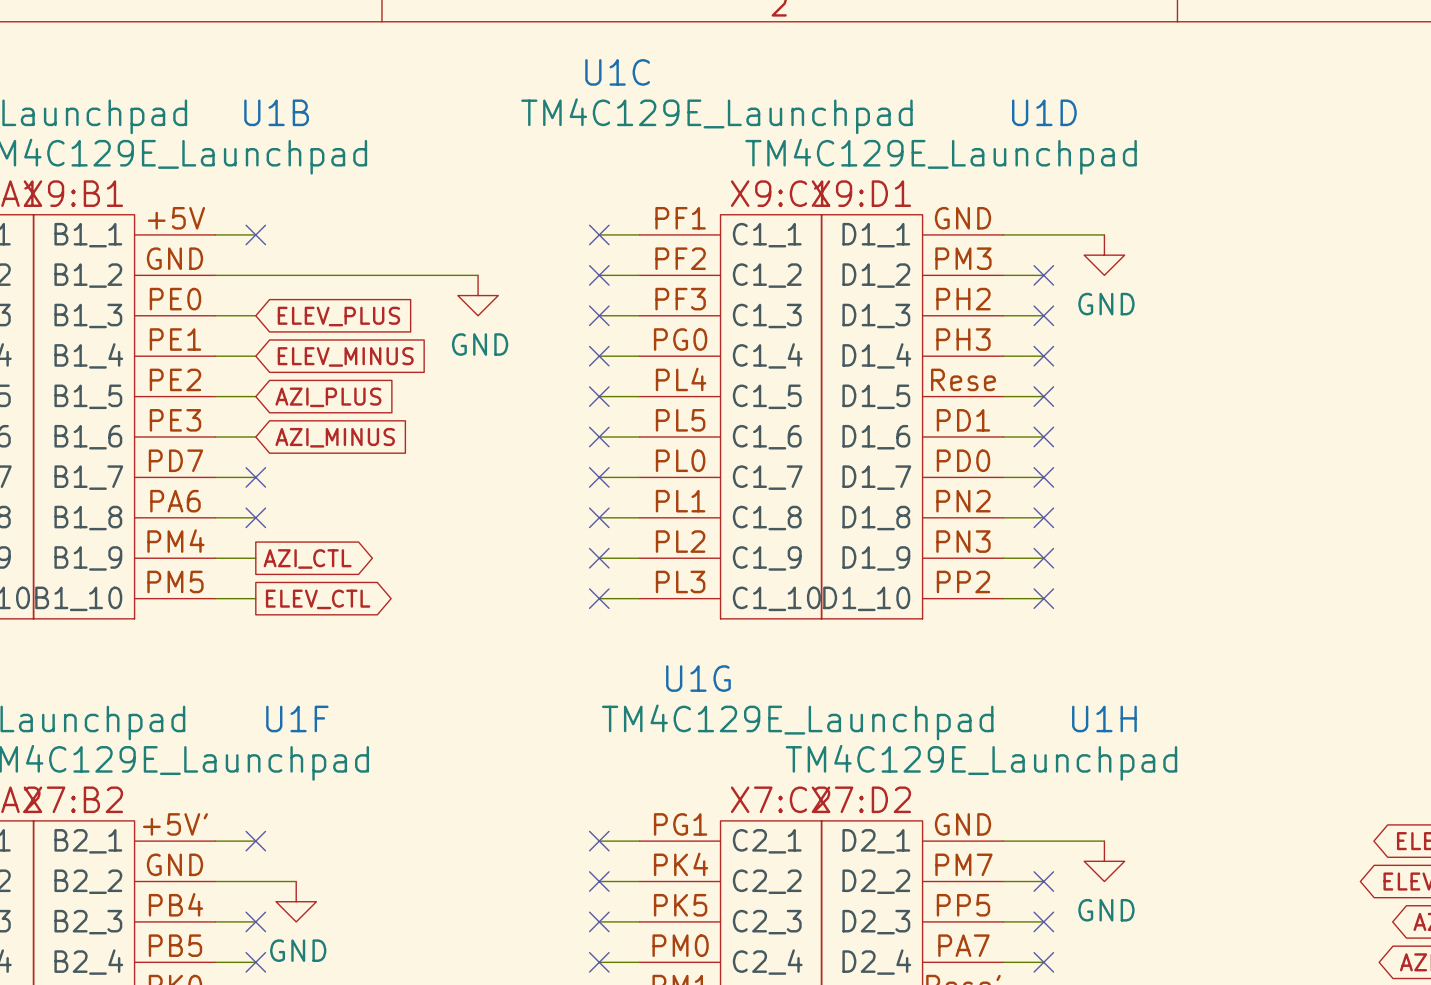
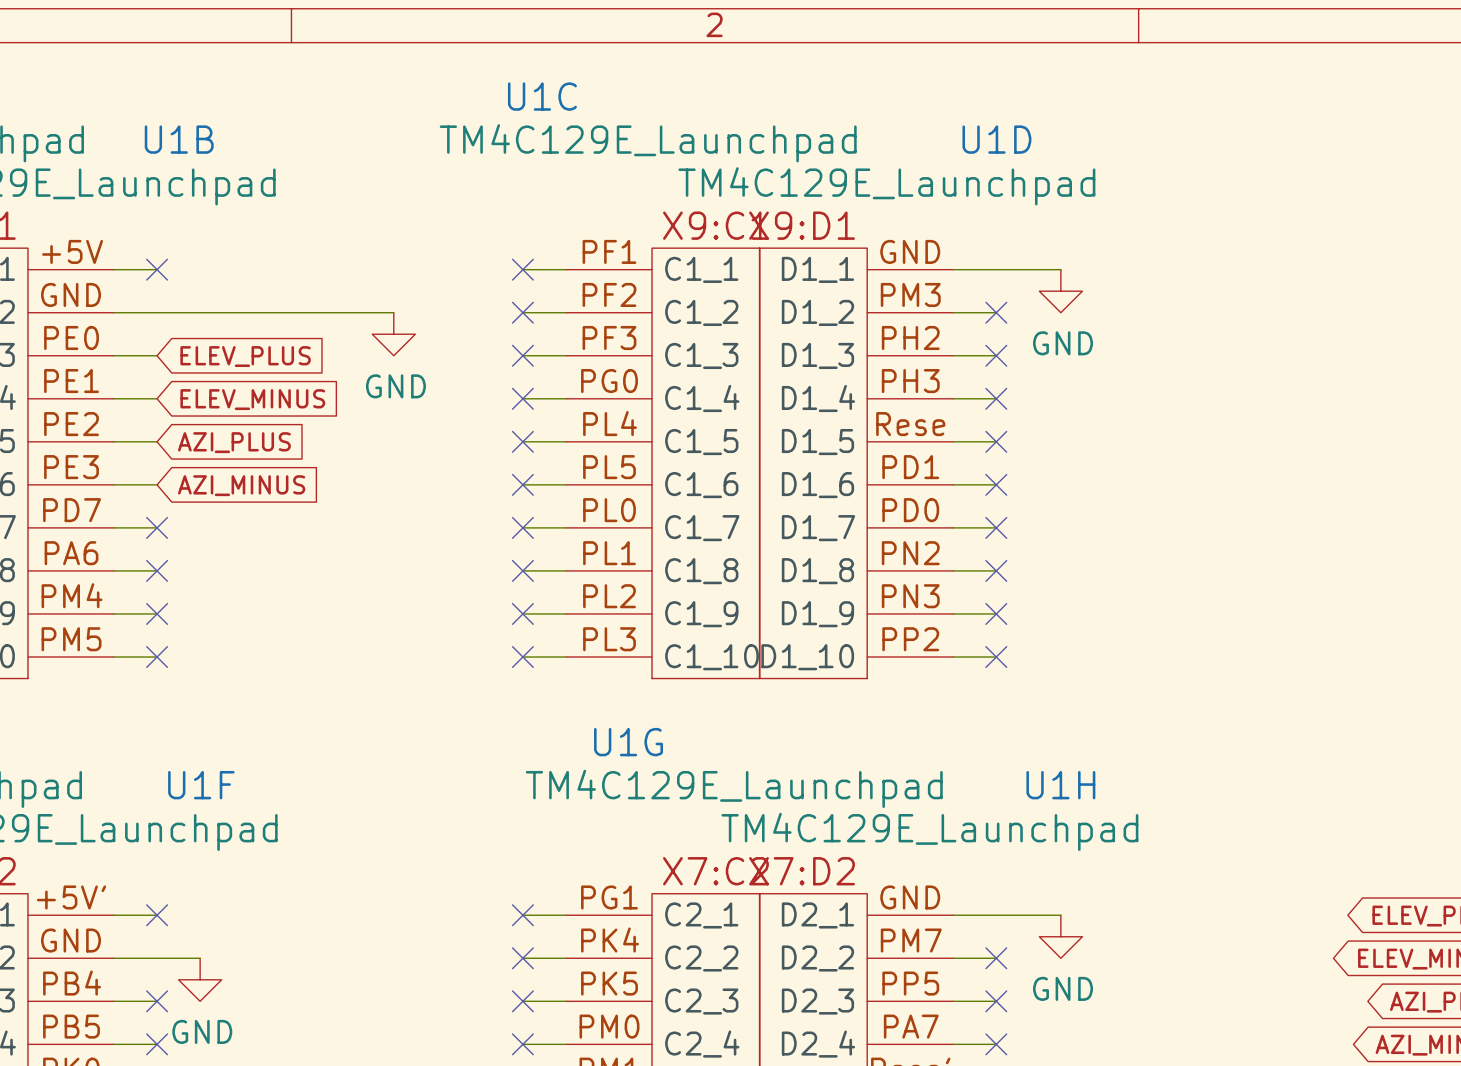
no-connect mark: none -> (157, 613)
global label: AZI_CTL (307, 558) -> none
no-connect mark: none -> (157, 657)
global label: ELEV_CTL (318, 599) -> none

